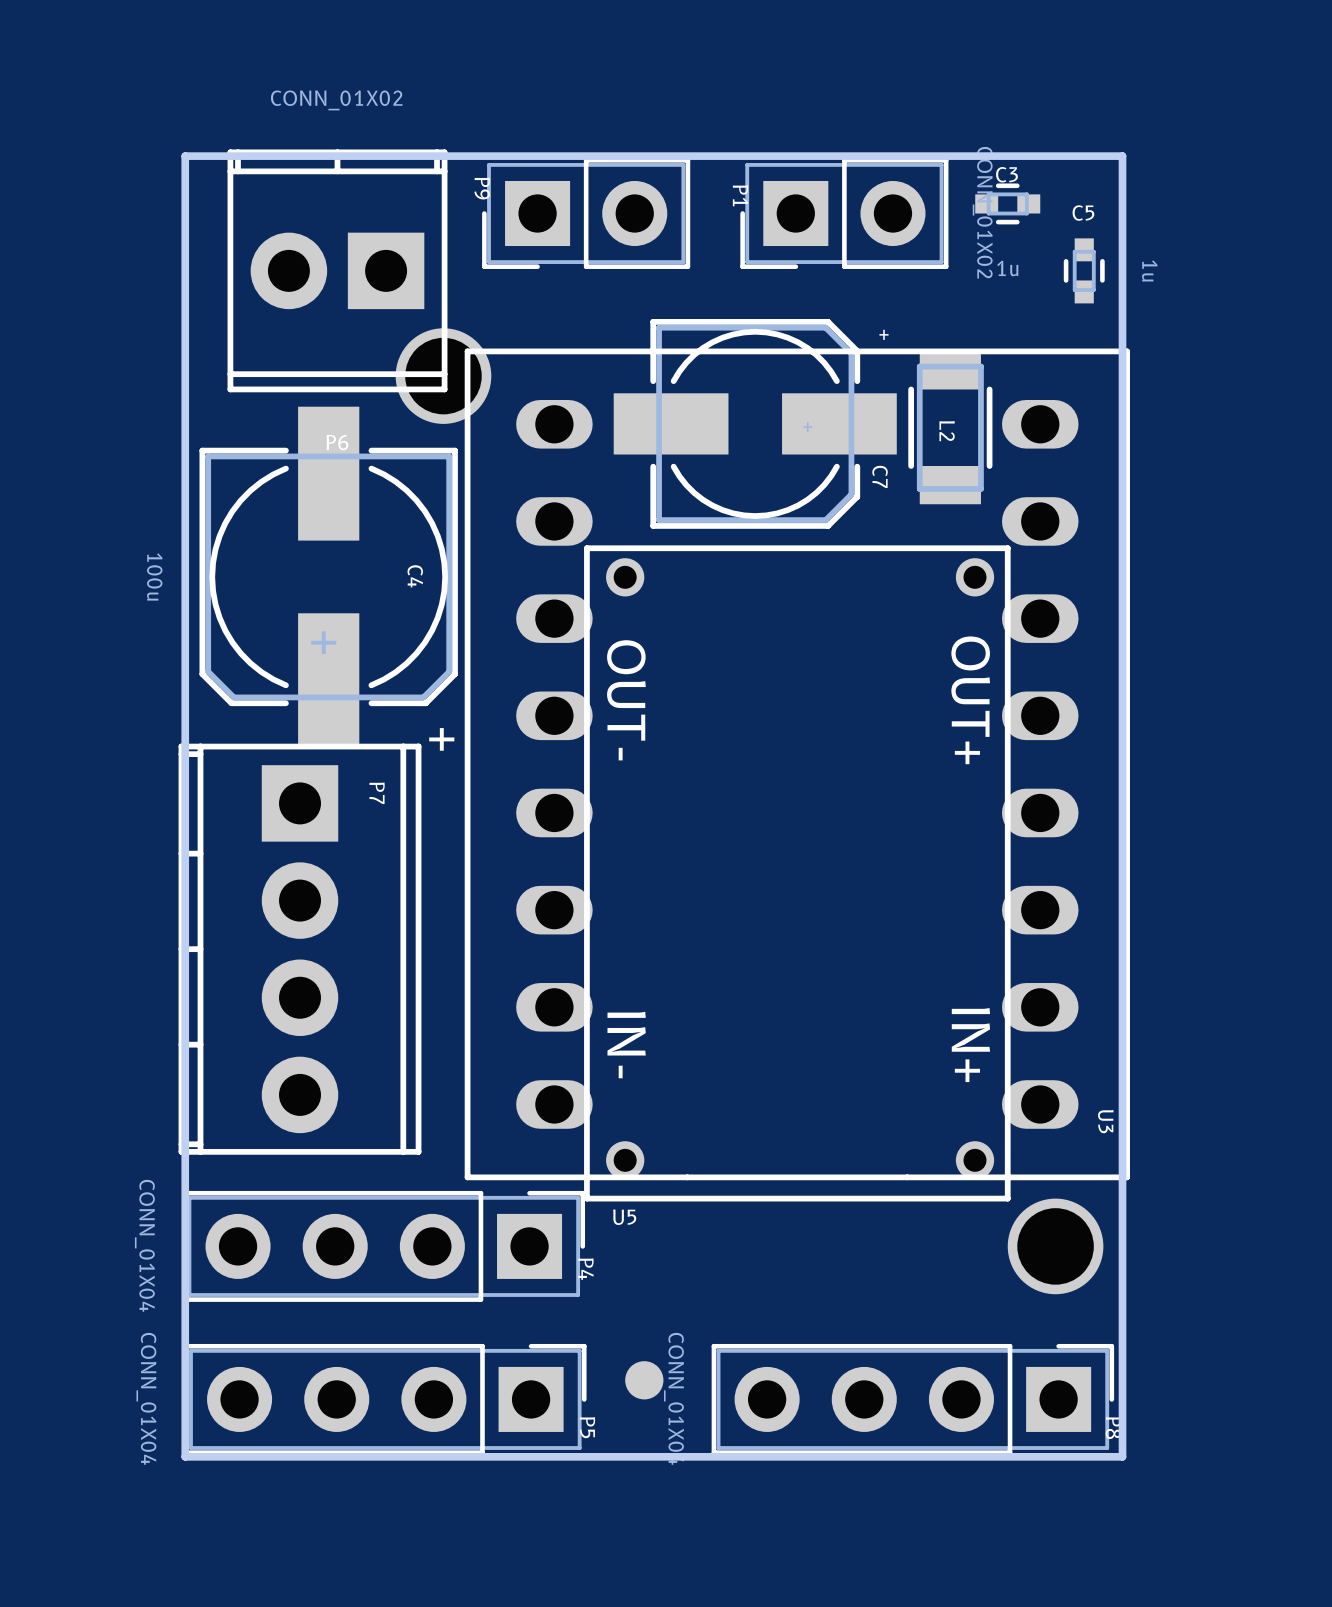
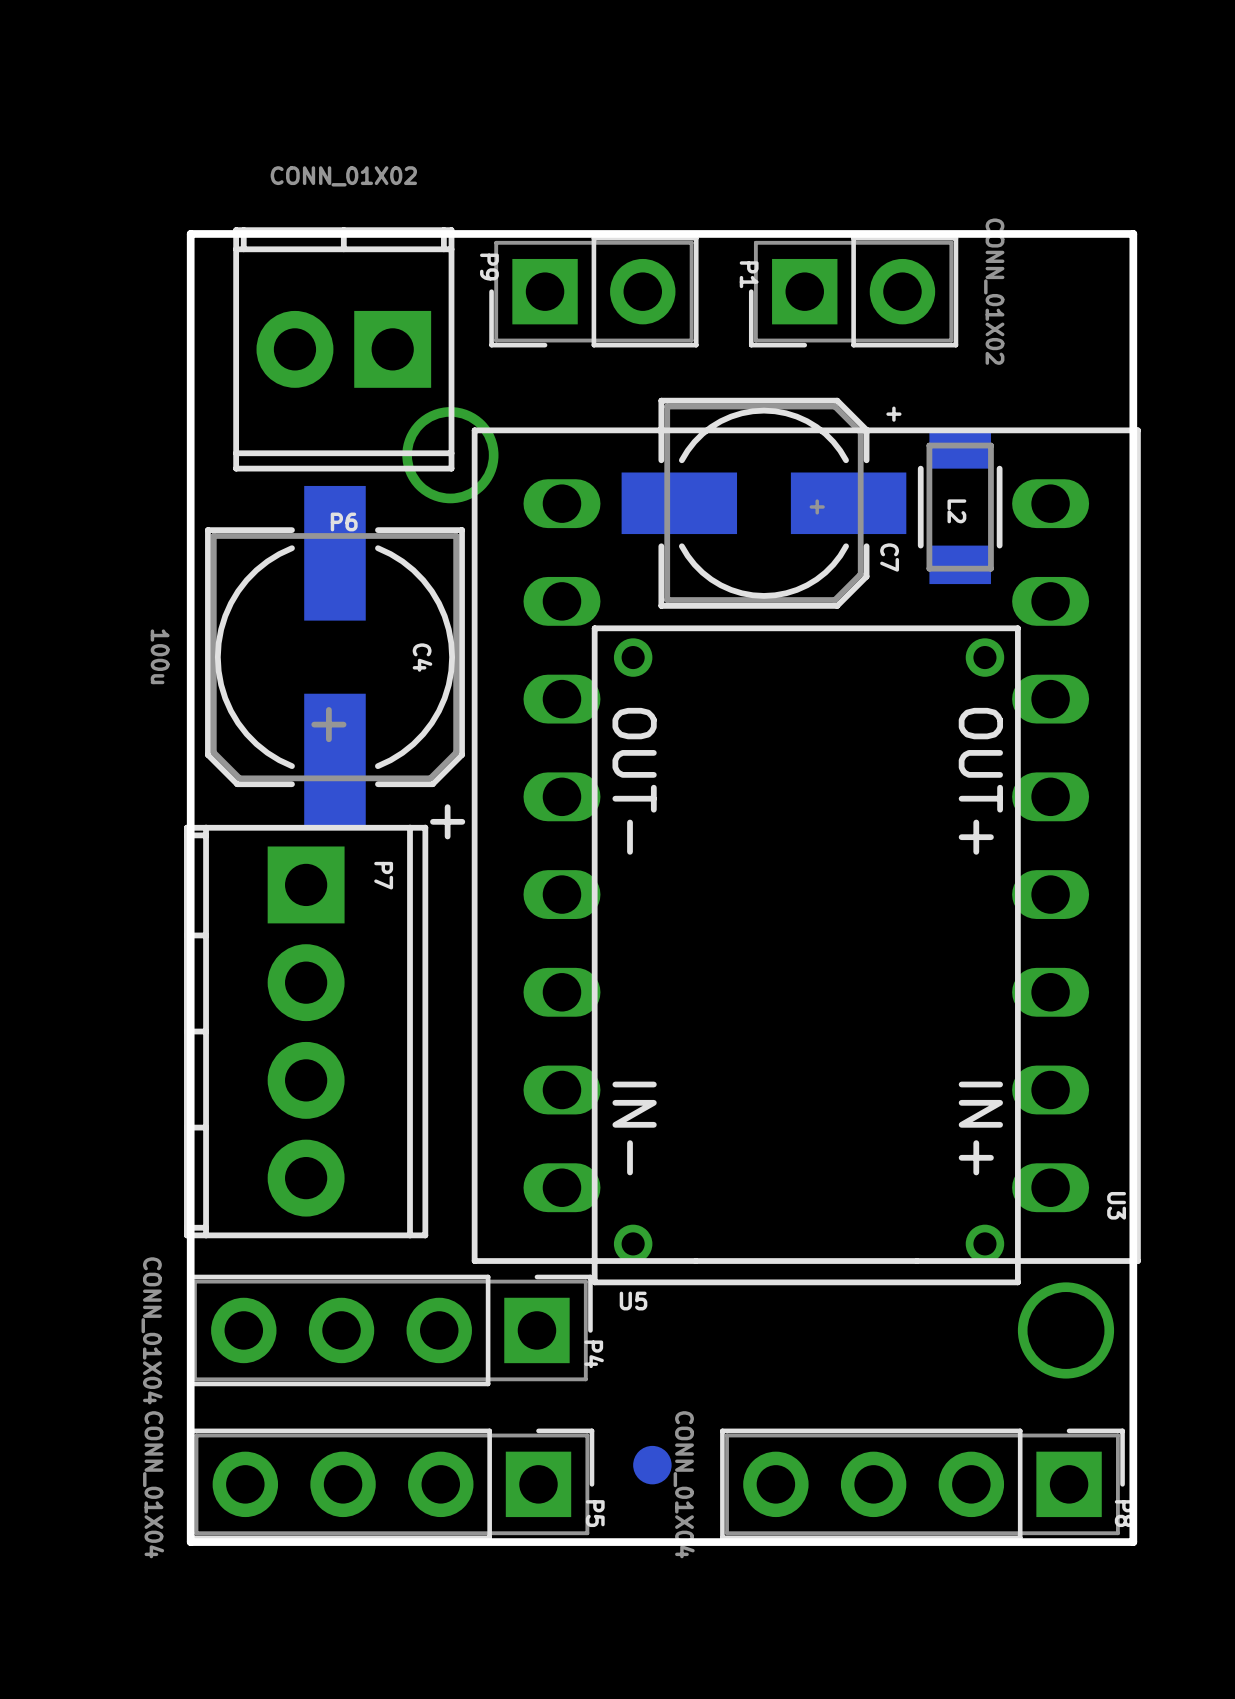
C3: 1u (1007, 203) -> none
C5: 1u (1084, 270) -> none

